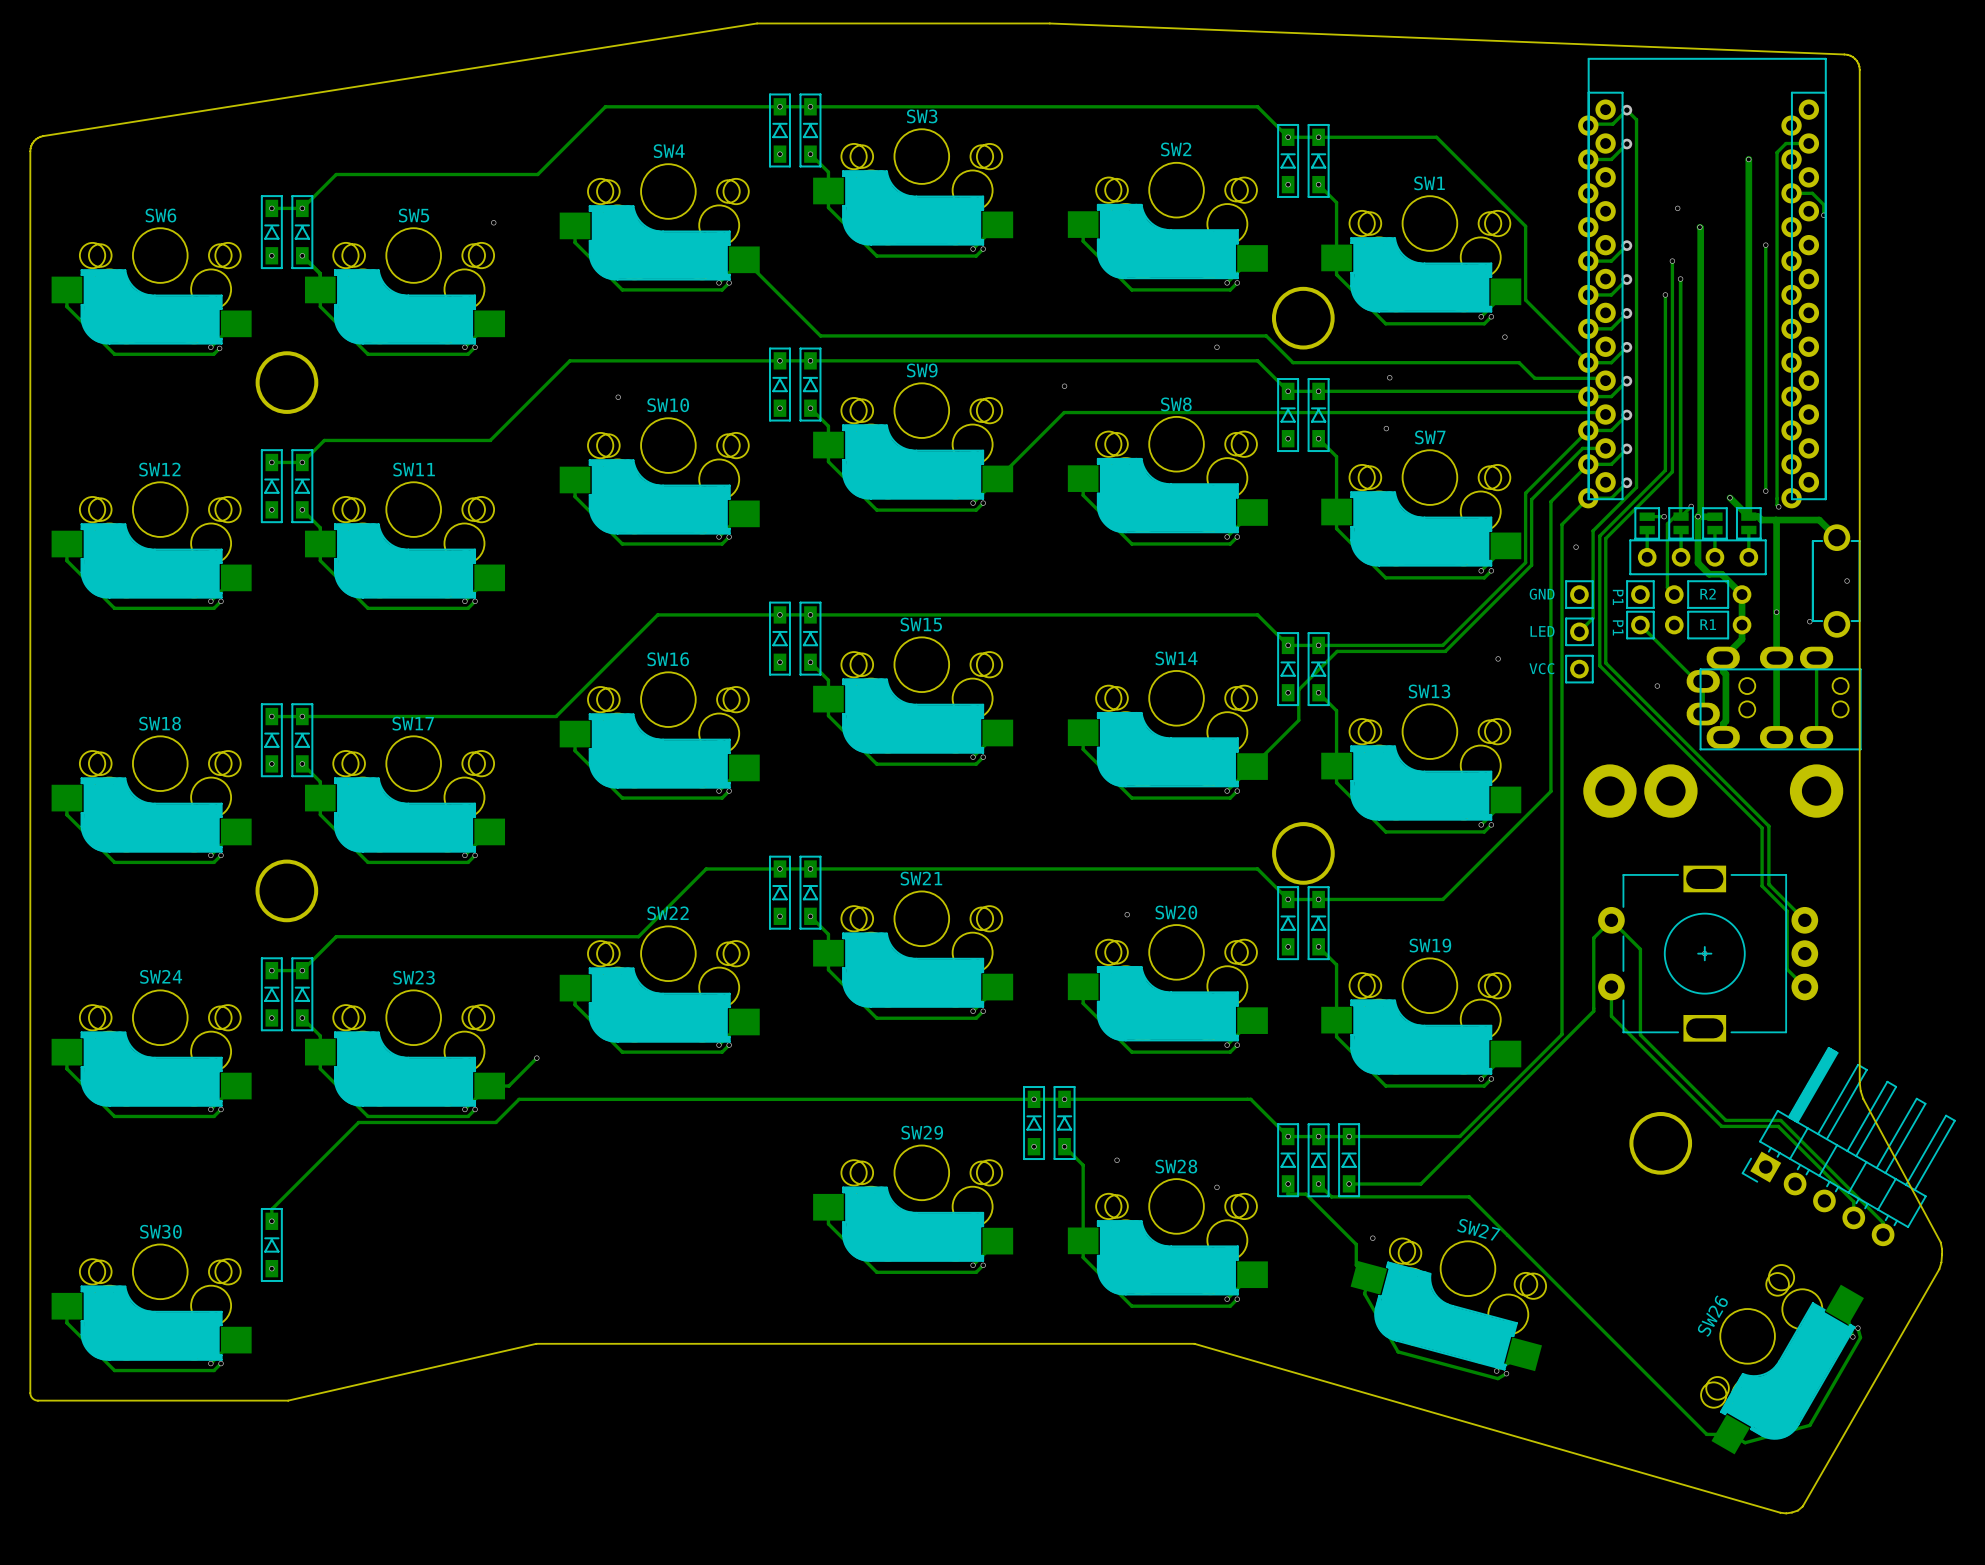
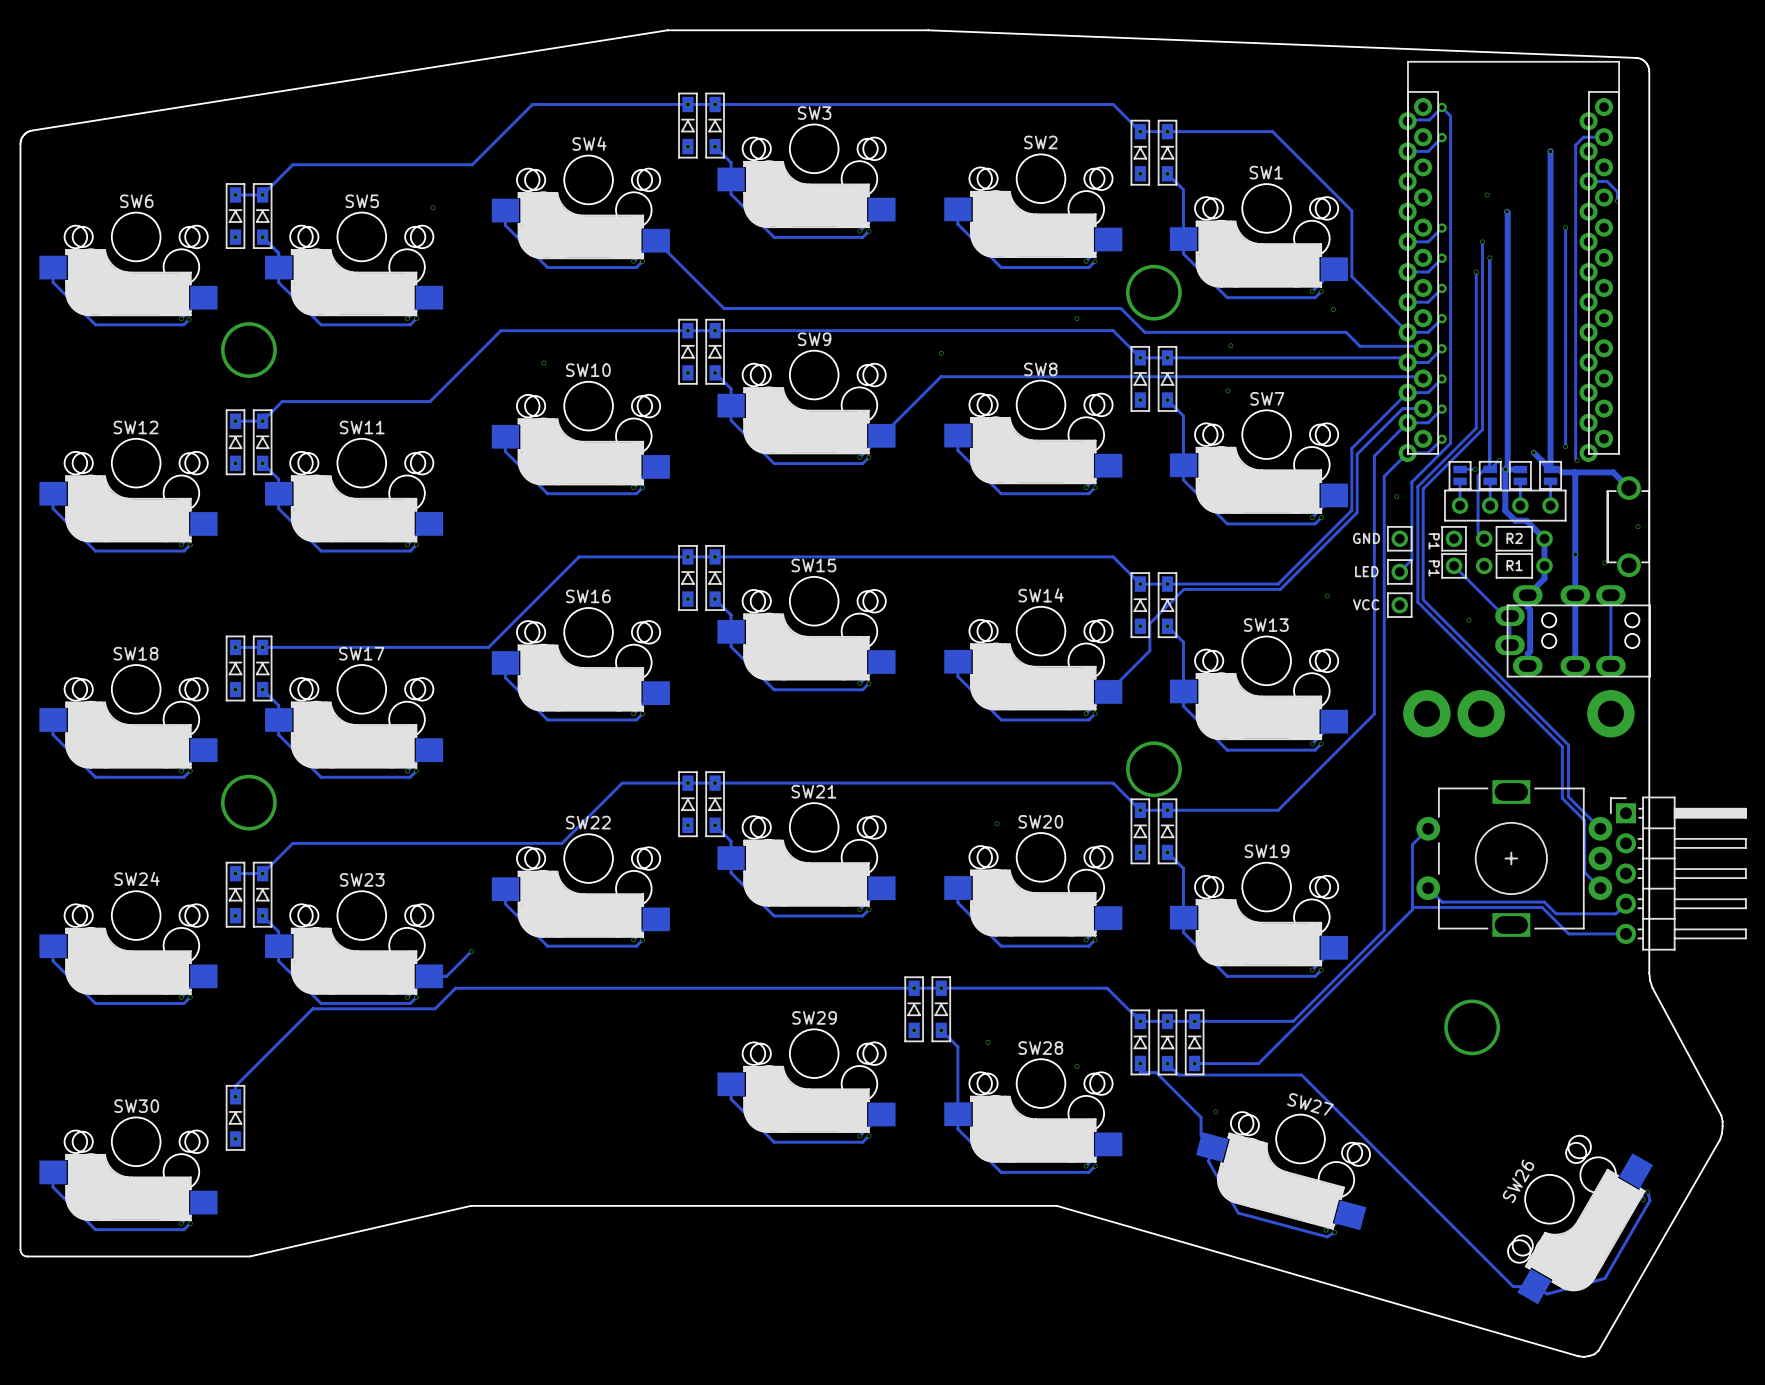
track: (1611, 920) (1640, 949) (1640, 1034) (1725, 1120) (1780, 1120) (1883, 1222) (1883, 1234) -> none
part: none -> (1678, 873)
track: (1611, 986) (1611, 1016) (1721, 1126) (1778, 1126) (1853, 1201) (1853, 1217) -> (1428, 888) (1442, 902) (1544, 902) (1556, 913) (1615, 913) (1625, 903)
track: none -> (1412, 907) (1542, 907) (1568, 933) (1625, 933)
part: (1848, 1146) -> none

